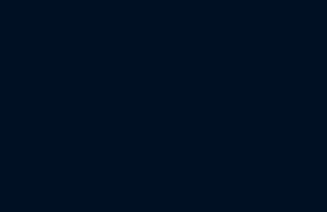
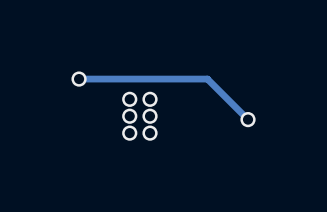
track: none -> (79, 79) (207, 79) (248, 119)
via: none -> (79, 79)
via: none -> (129, 99)
via: none -> (150, 99)
via: none -> (129, 116)
via: none -> (150, 116)
via: none -> (248, 119)
via: none -> (129, 133)
via: none -> (150, 133)

